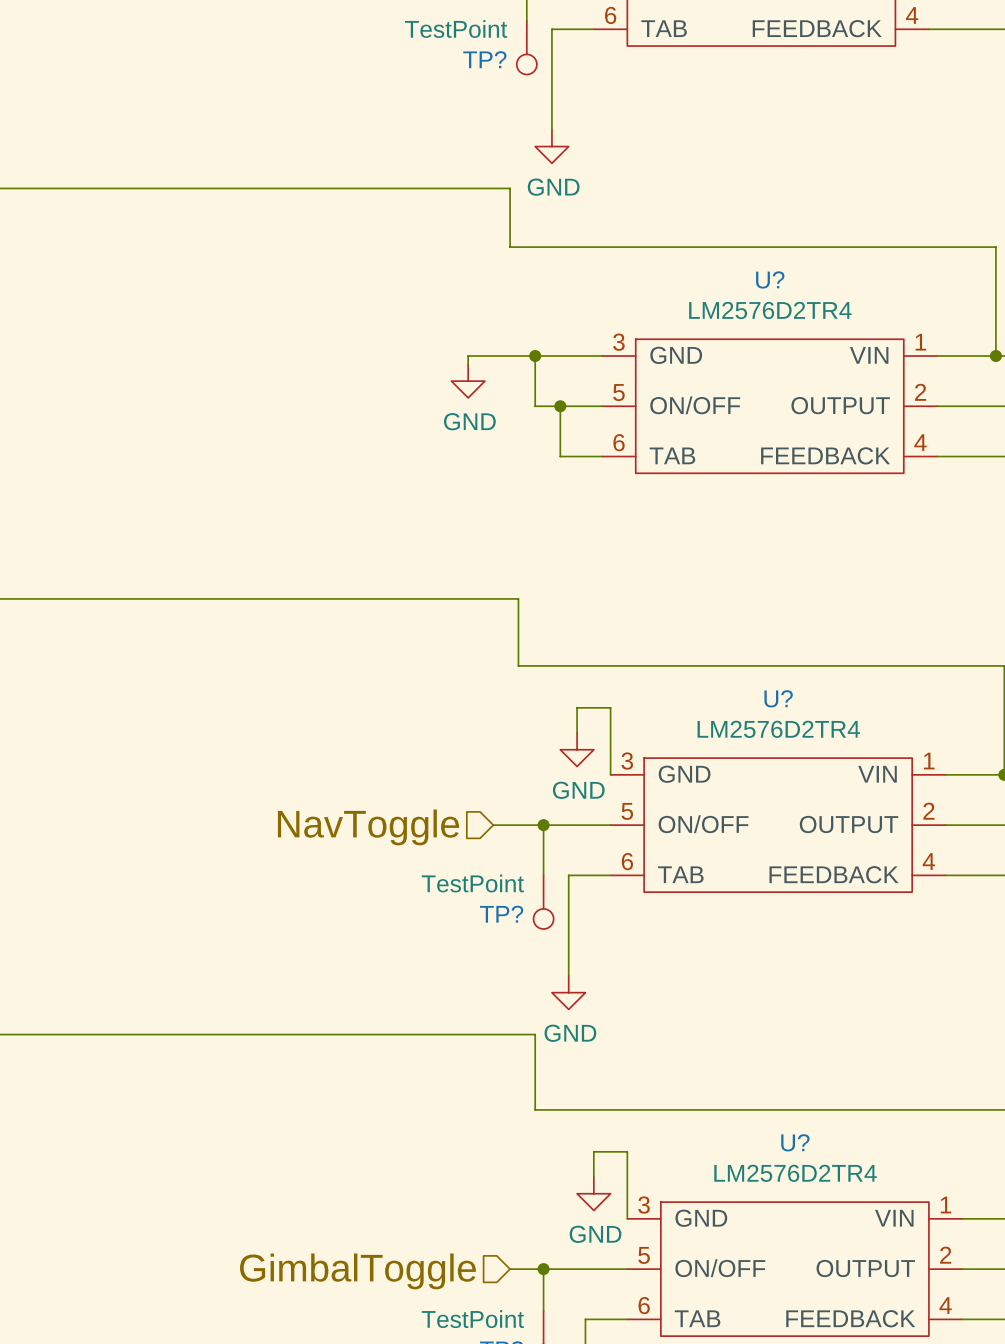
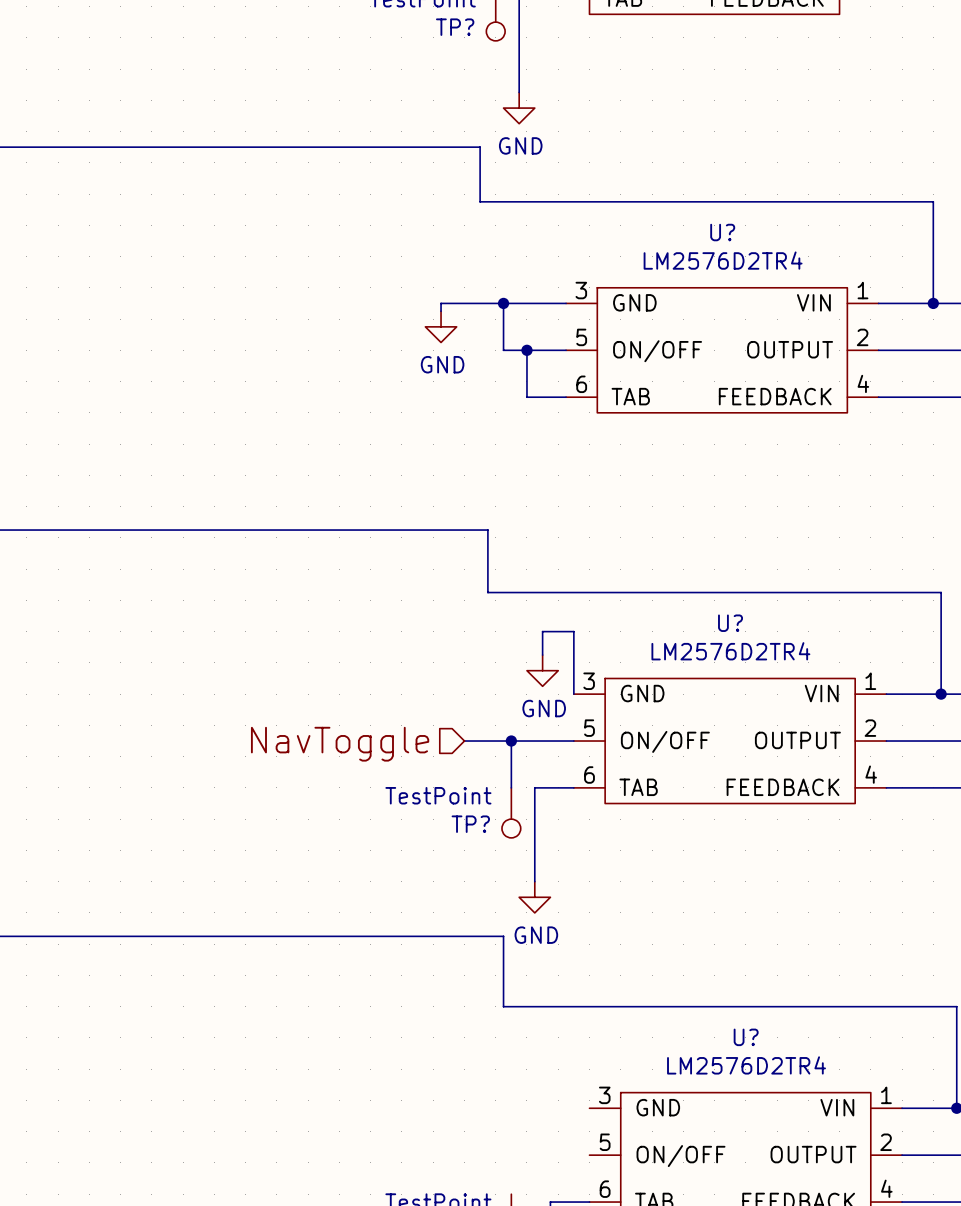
wire: (593, 1176) (593, 1151) (627, 1151) (627, 1218) -> none
power symbol: GND (593, 1193) -> none
wire: (510, 1269) (627, 1269) -> none
wire: (543, 1269) (543, 1311) -> none
junction: (543, 1269) -> none
hierarchical label: GimbalToggle (357, 1271) -> none

